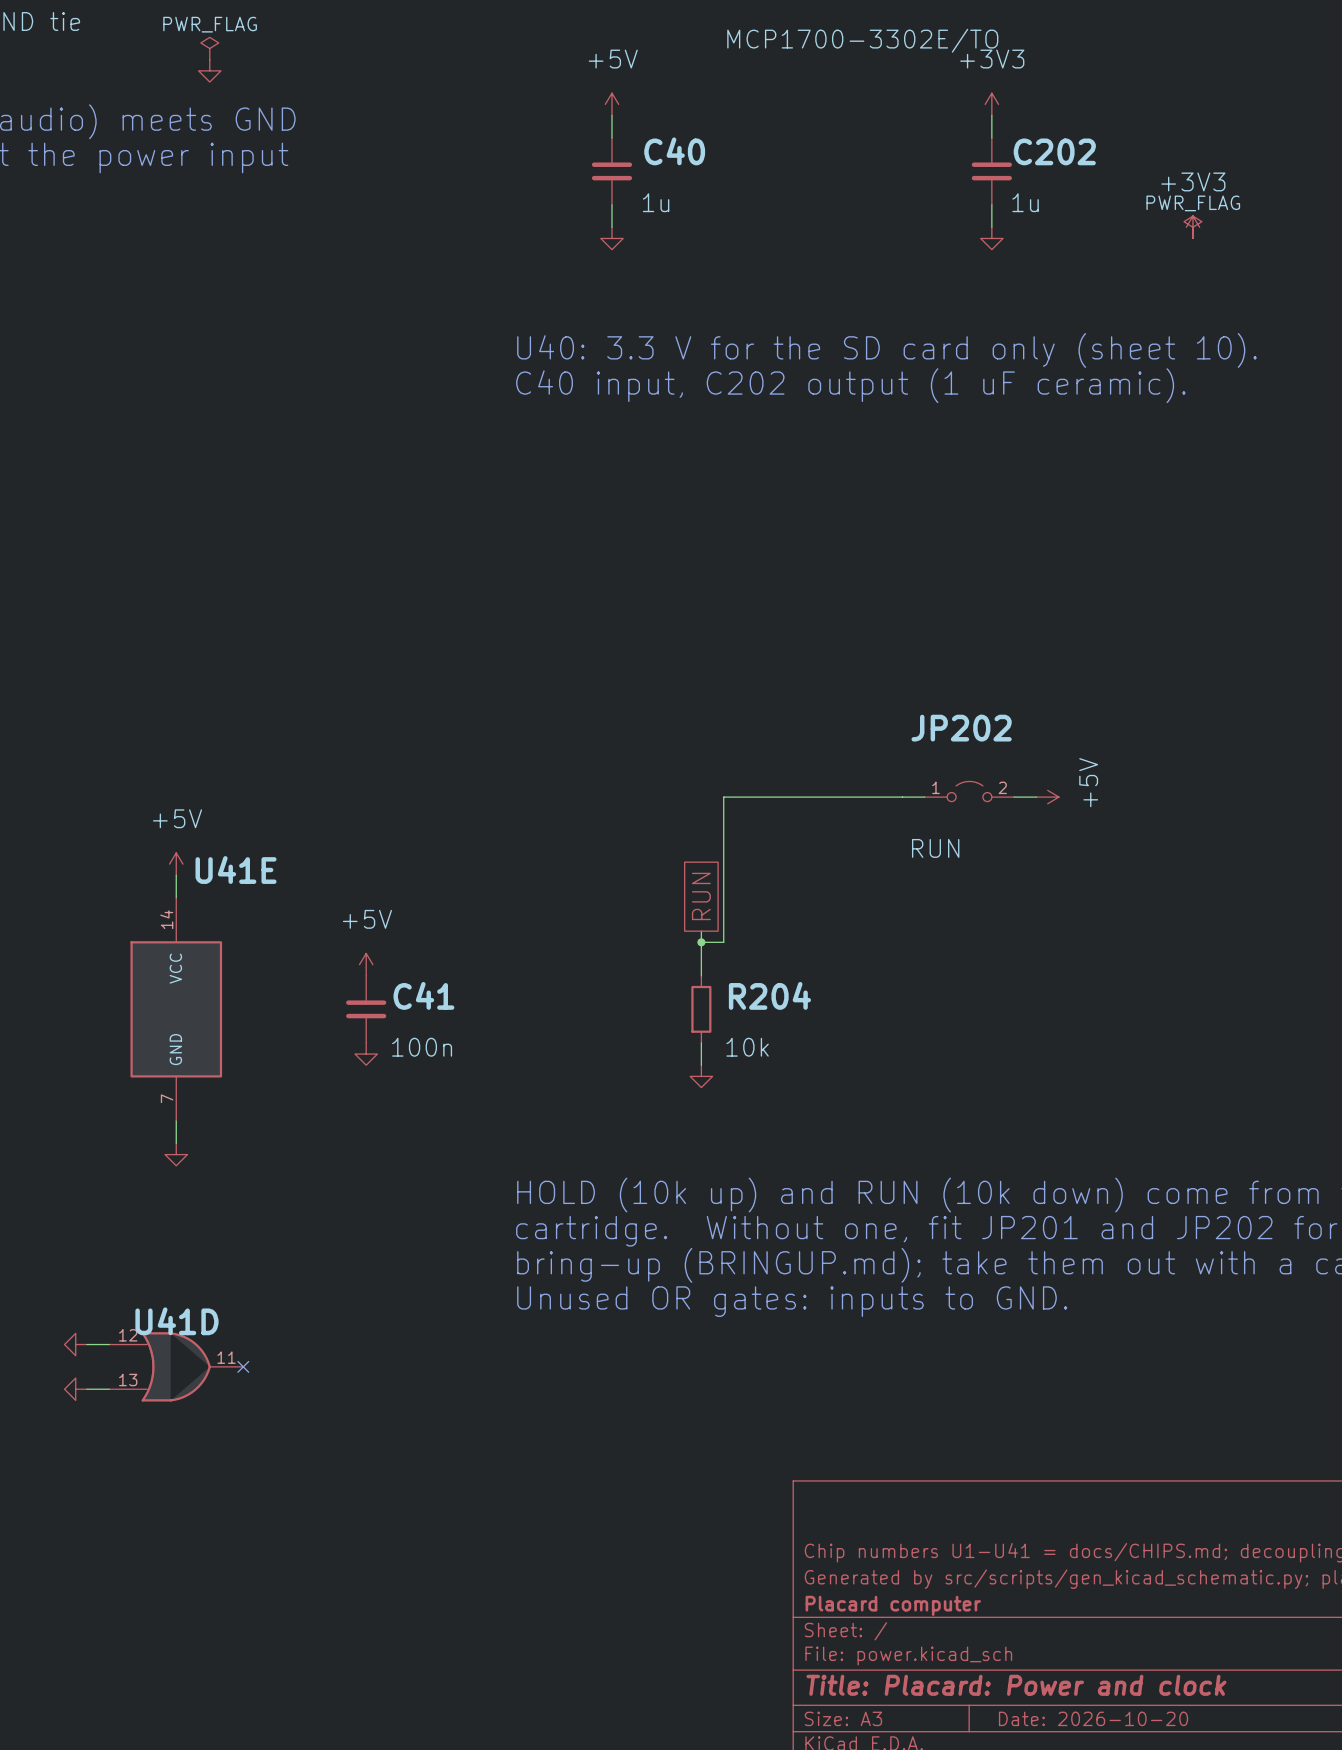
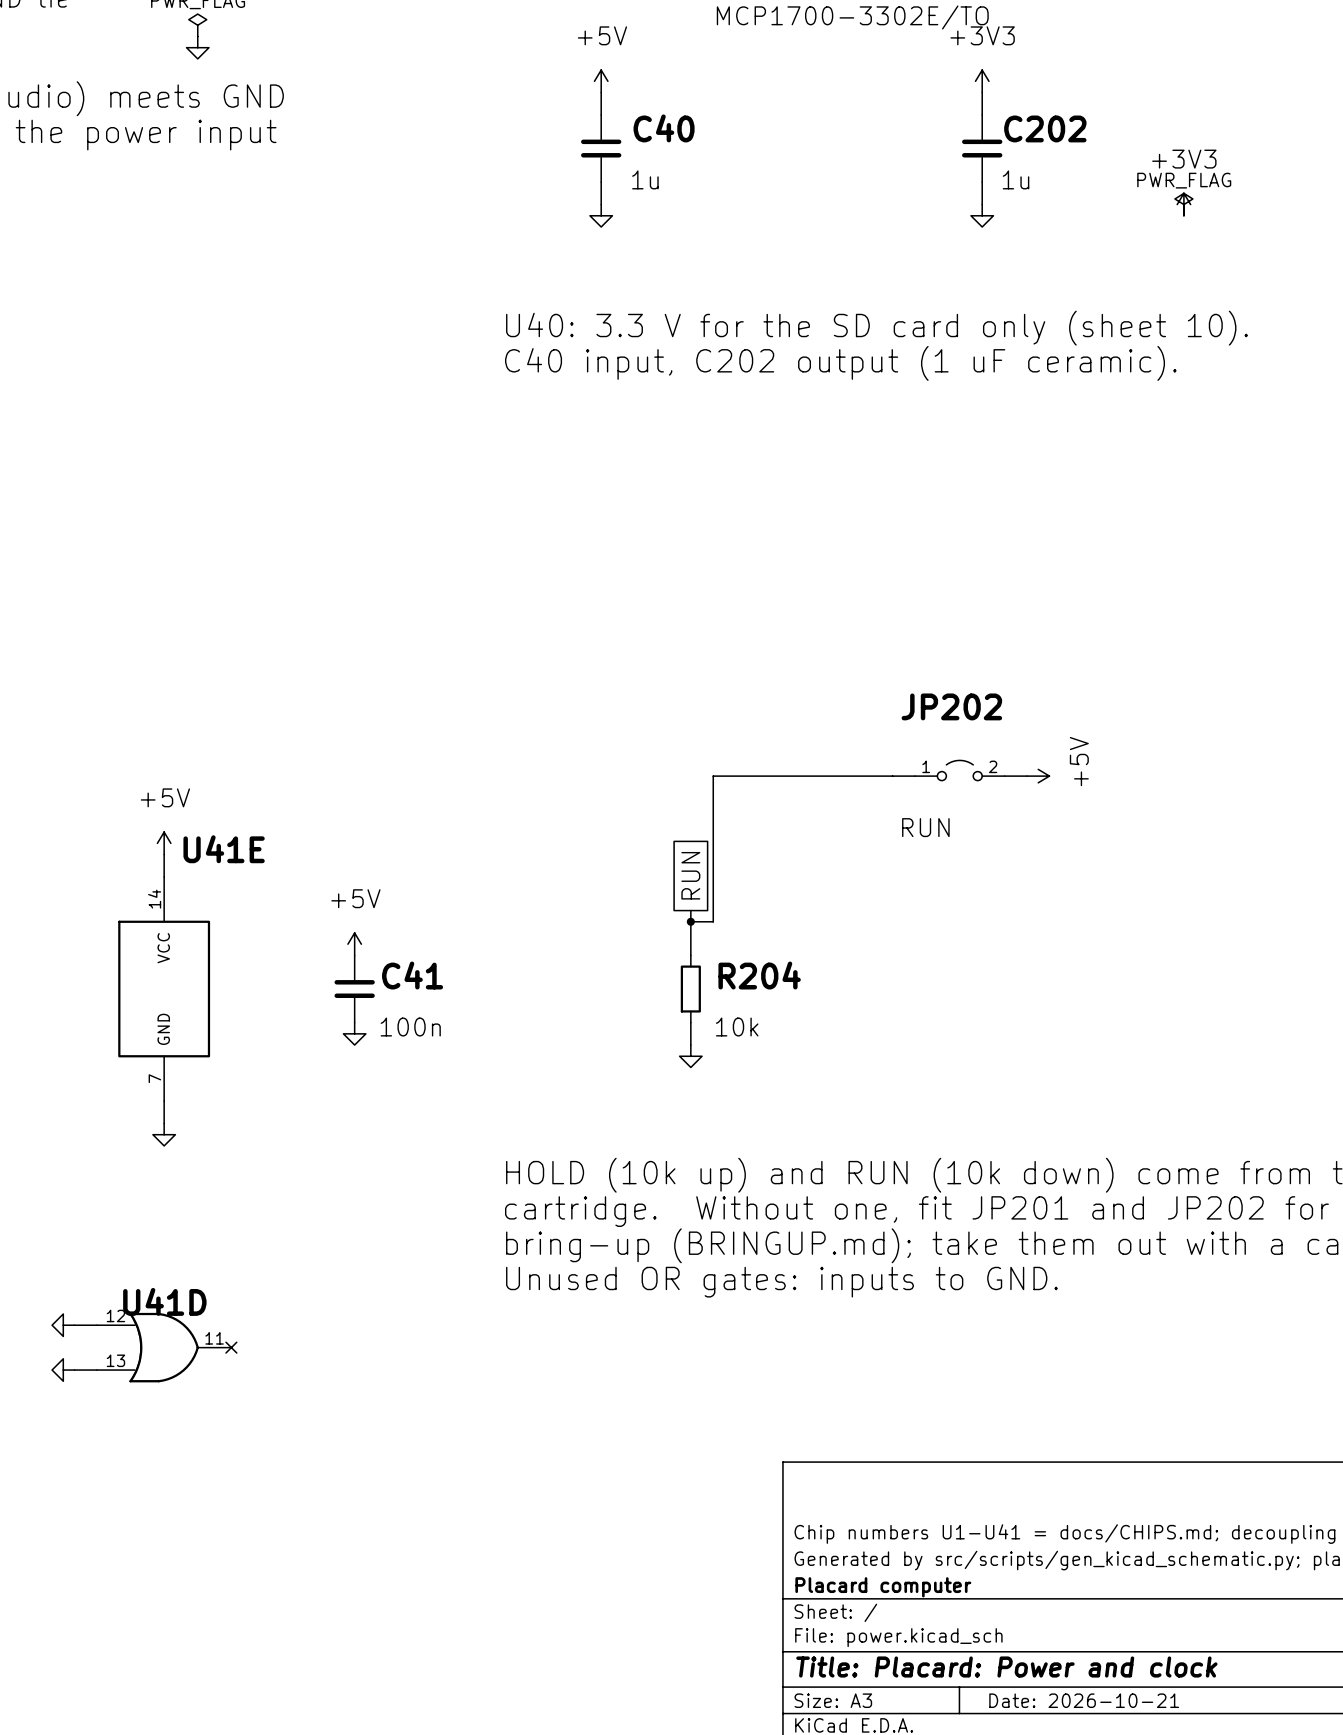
title block: Date: 2026-10-20 (1093, 1718) -> Date: 2026-10-21 (1084, 1700)

